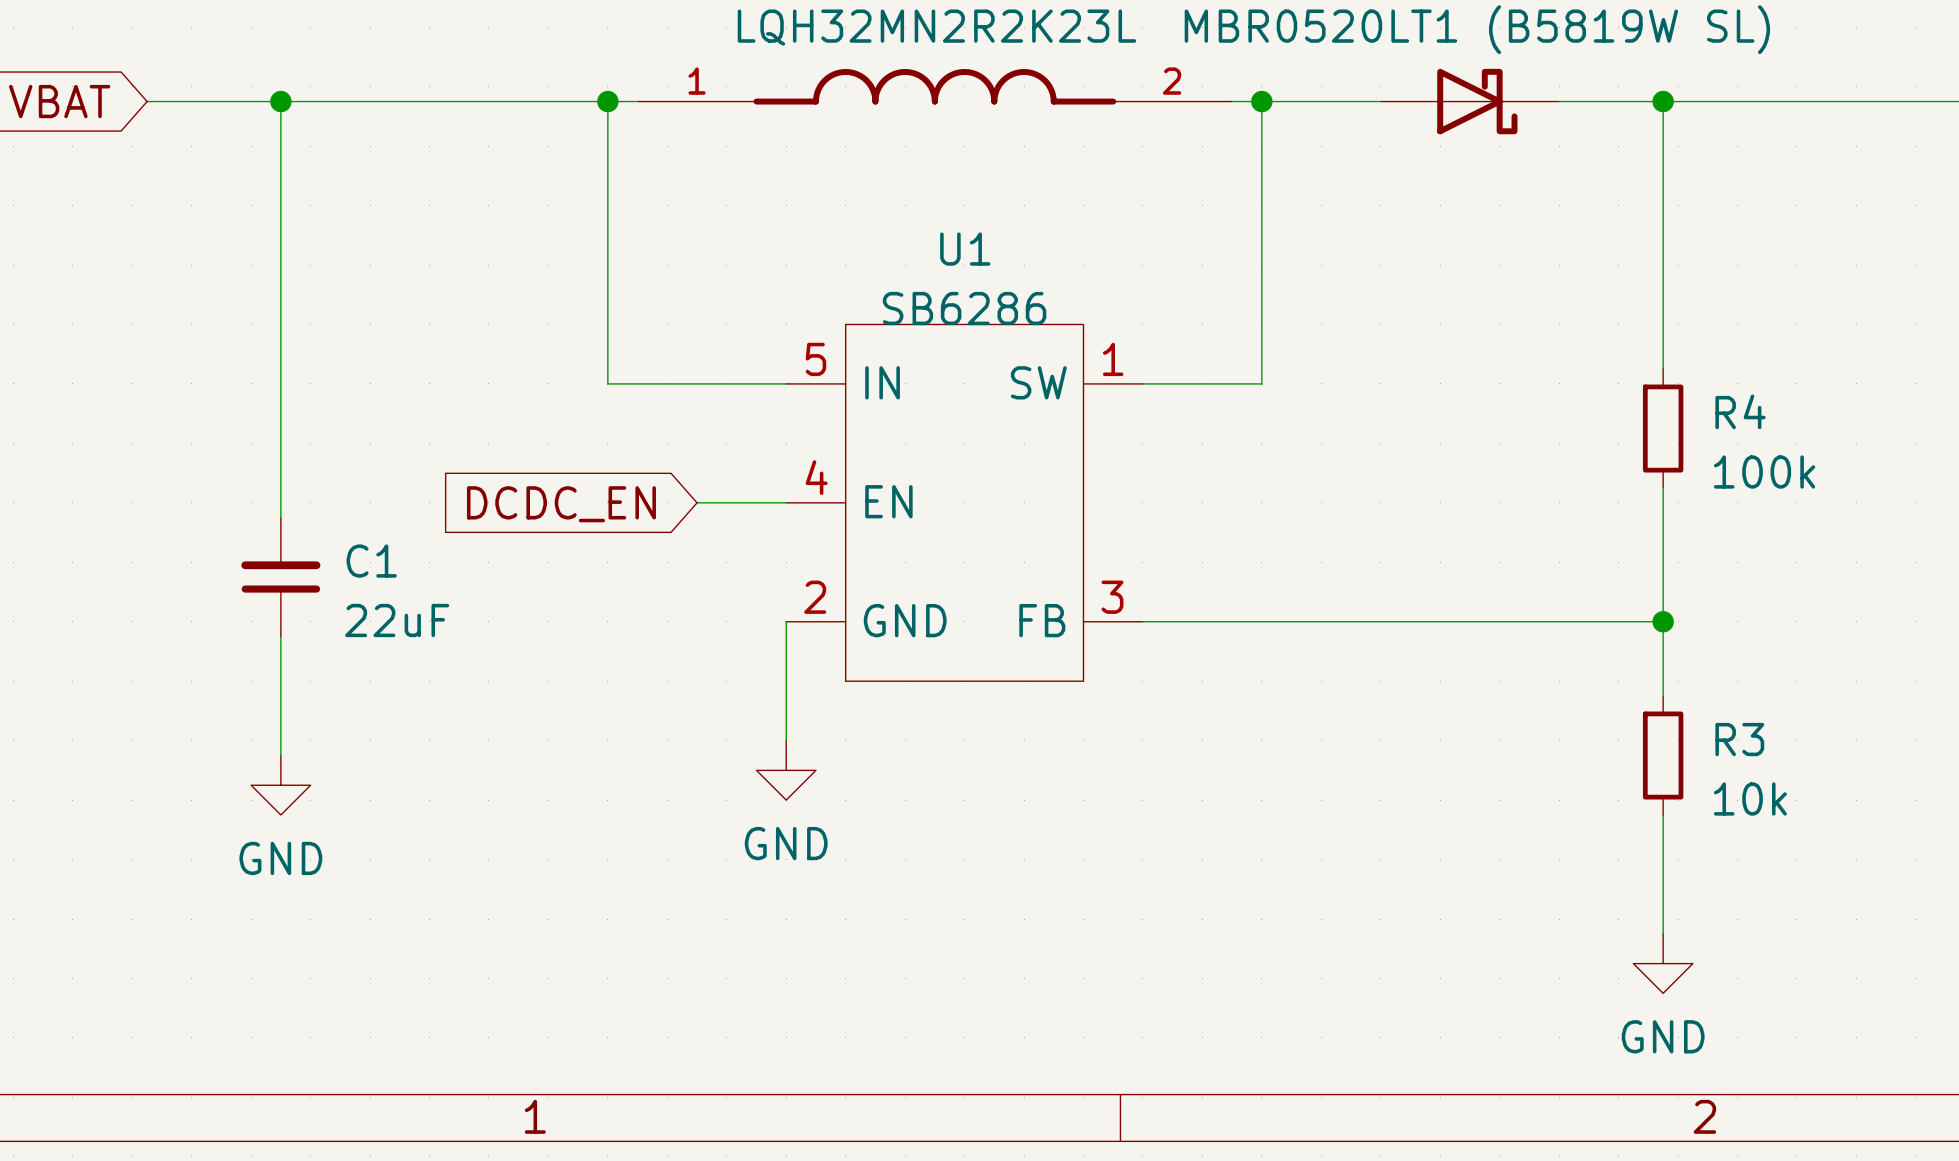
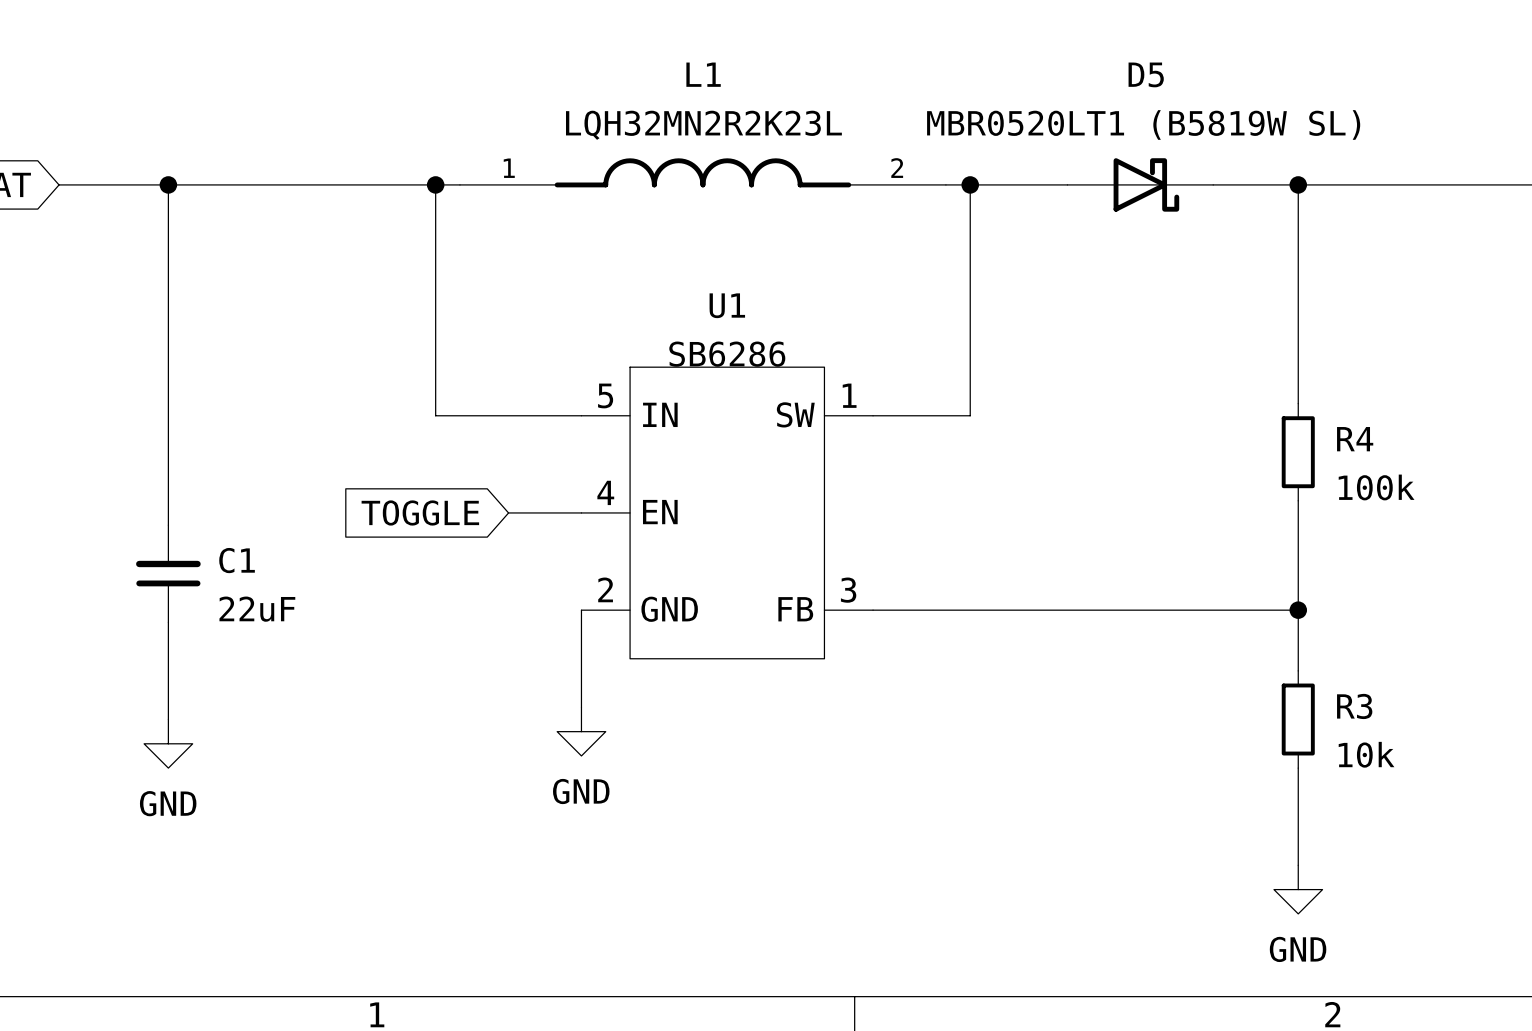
global label: DCDC_EN (561, 504) -> TOGGLE (420, 512)

